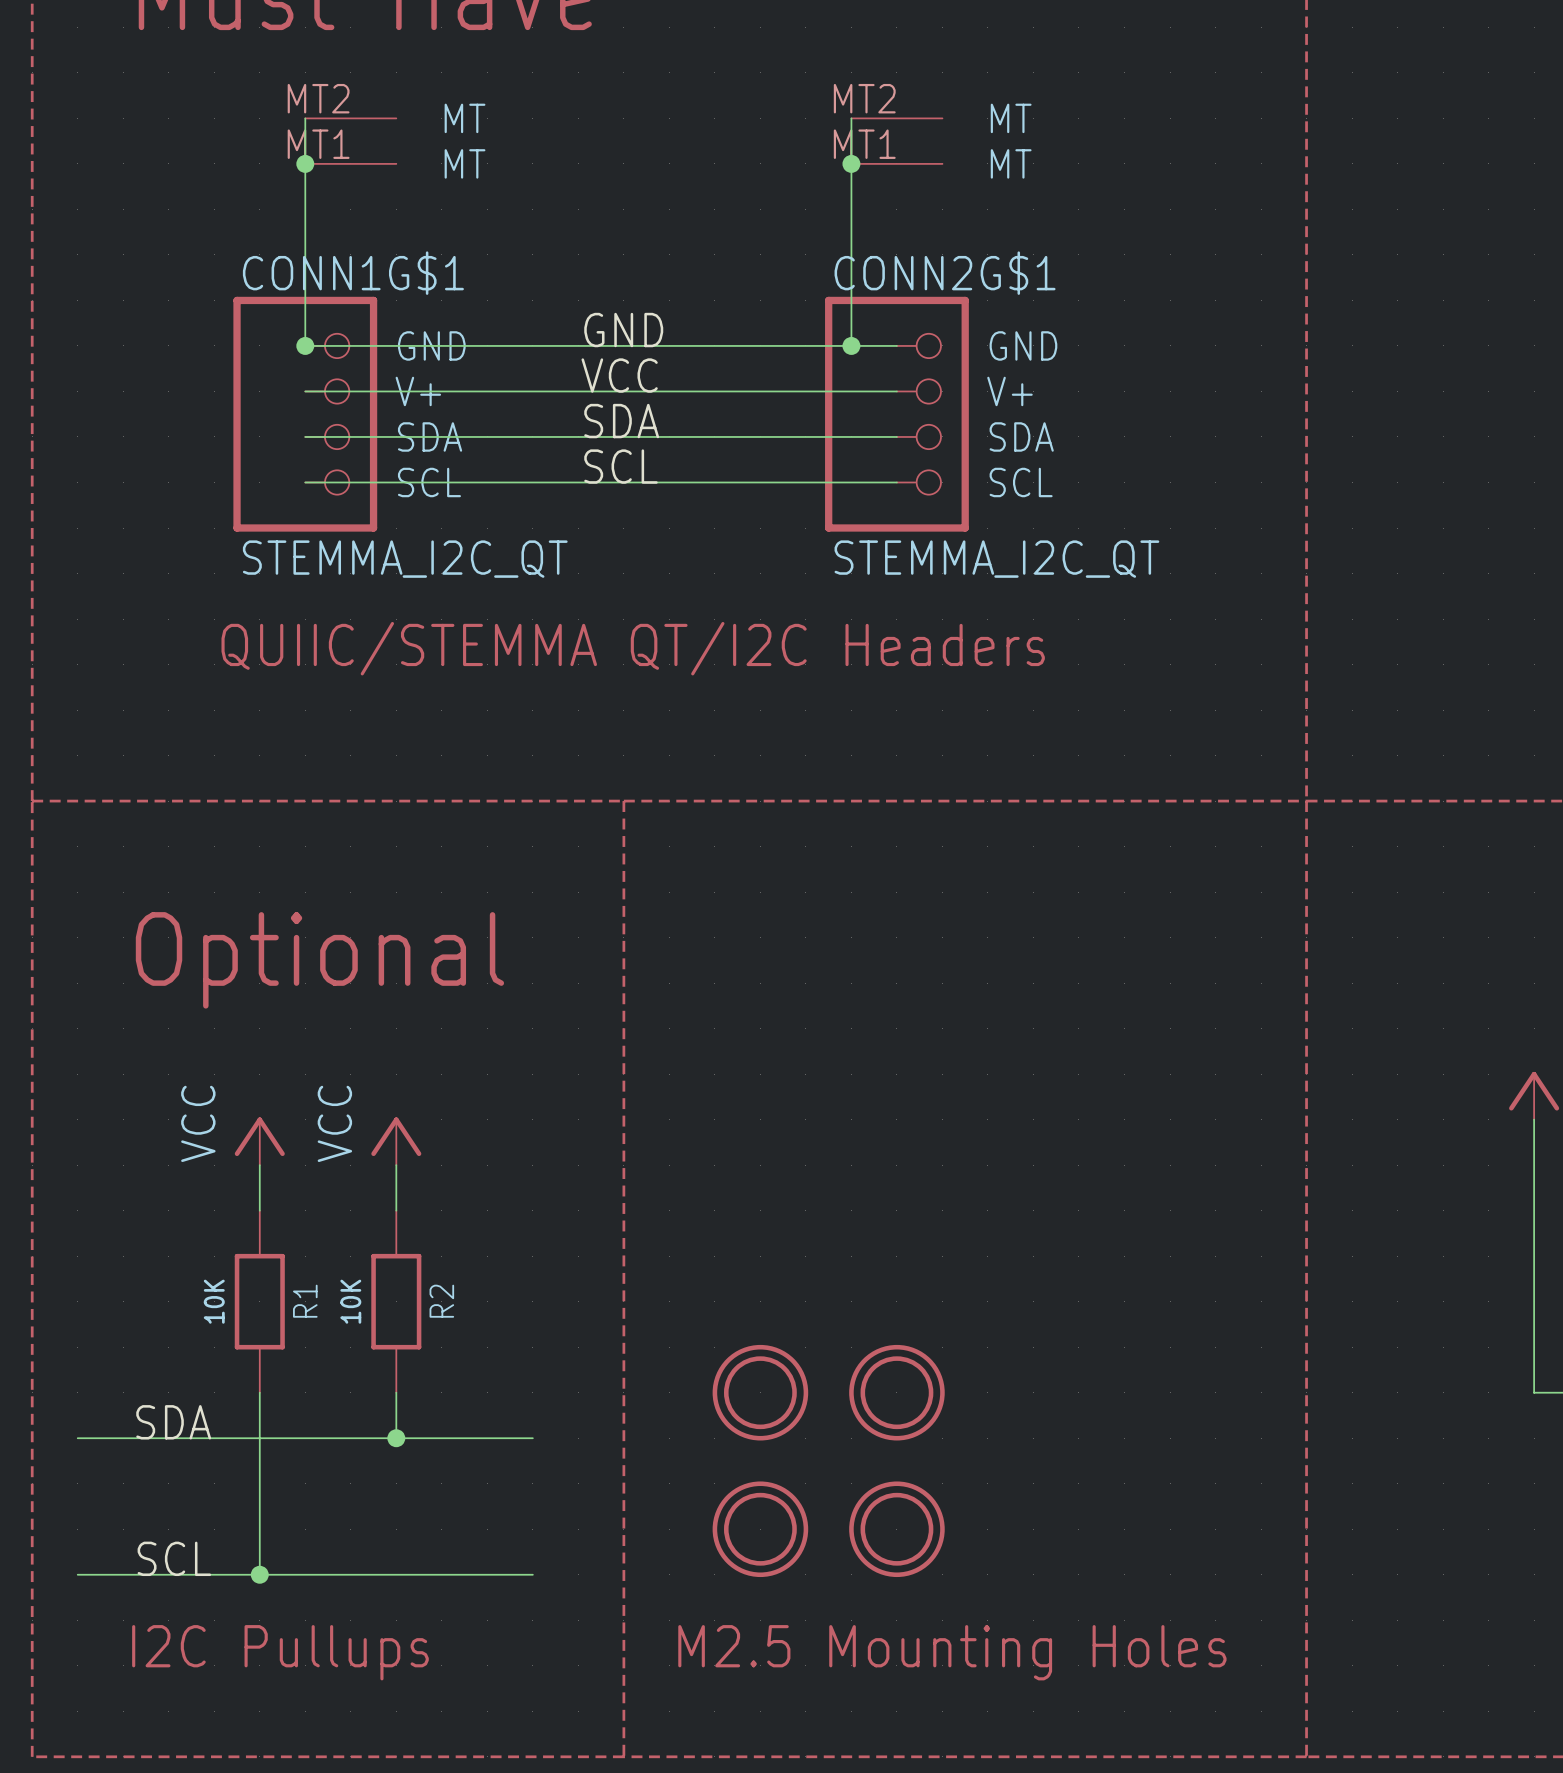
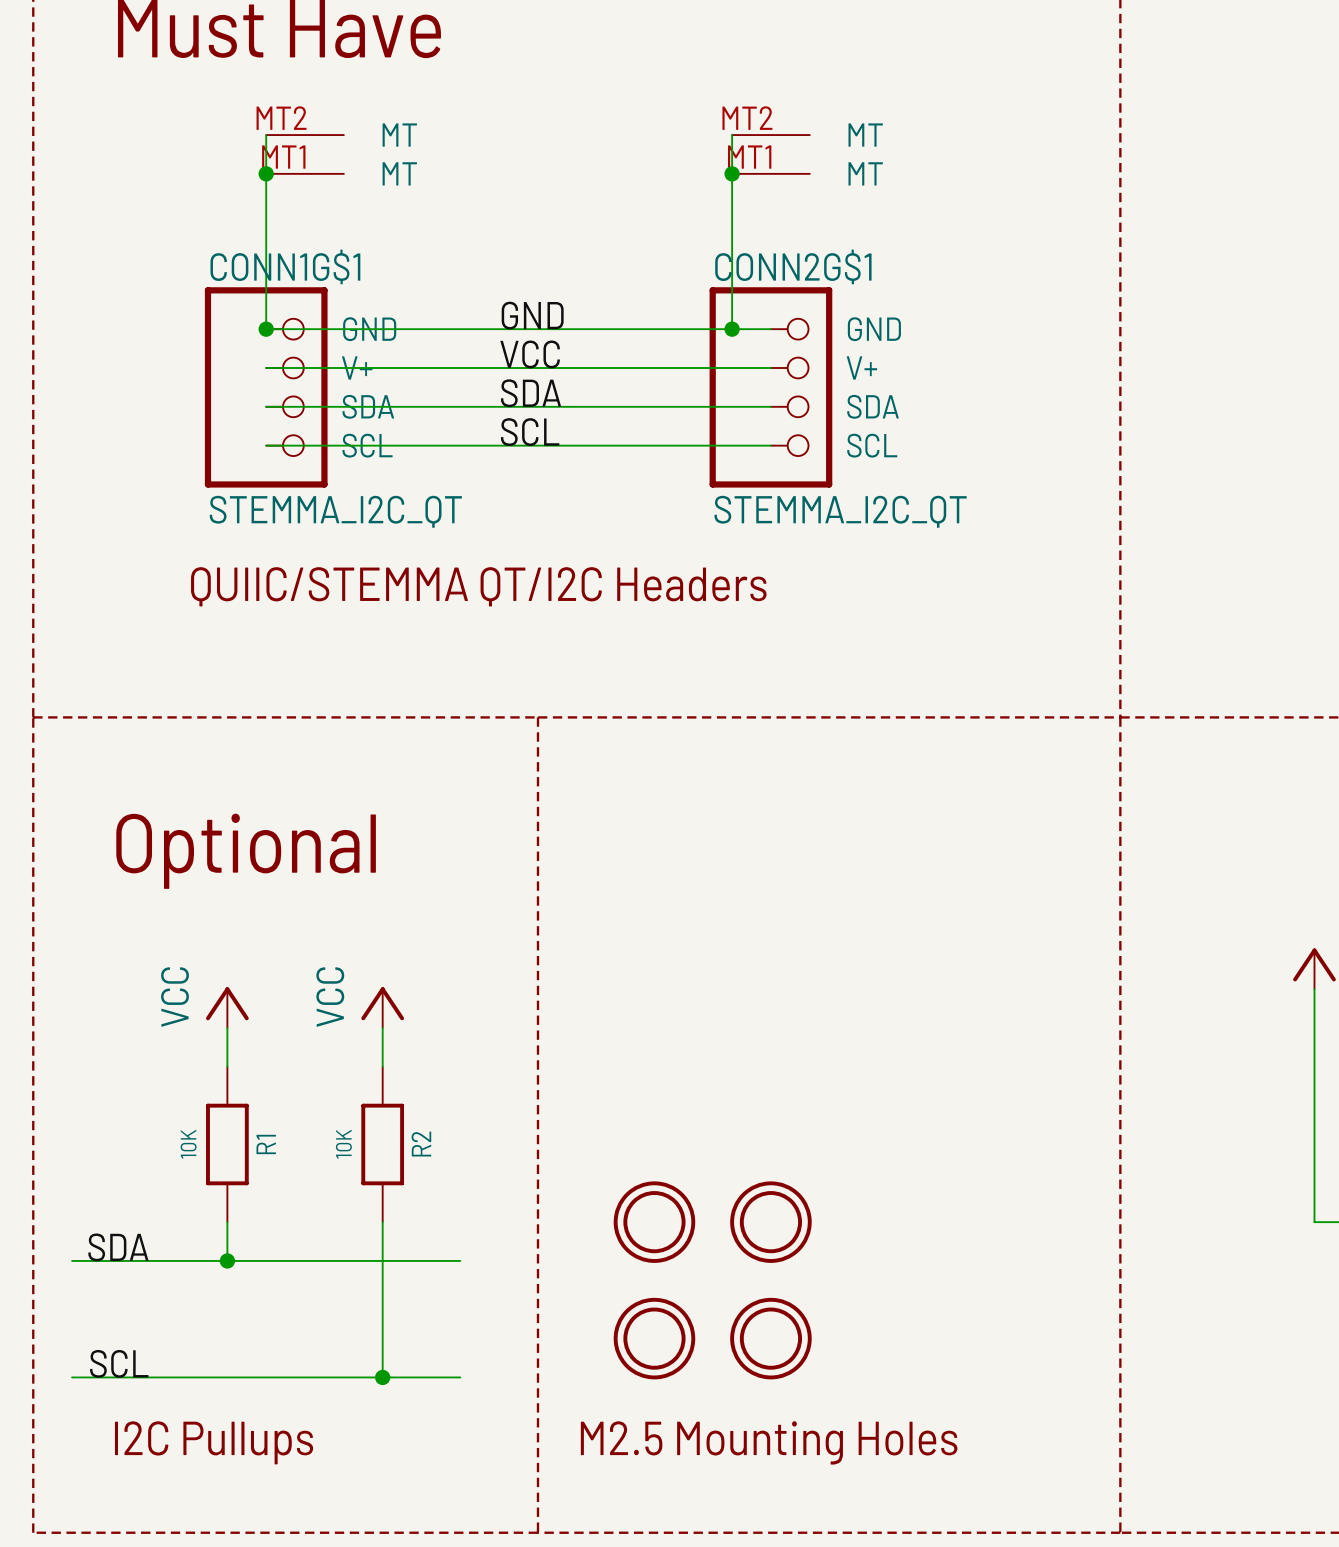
power symbol position: VCC (396, 1141) -> VCC (382, 1007)
wire: (396, 1165) (396, 1210) -> (382, 1028) (382, 1066)
R2 position: (396, 1301) -> (382, 1144)
wire: (396, 1392) (396, 1438) -> none
wire: none -> (382, 1222) (382, 1377)
label position: SDA (173, 1422) -> SDA (118, 1247)
wire: (259, 1438) (259, 1574) -> none
junction: none -> (227, 1260)
junction: (396, 1438) -> none
label position: SCL (174, 1558) -> SCL (119, 1363)
junction: (259, 1574) -> none
junction: none -> (382, 1377)

